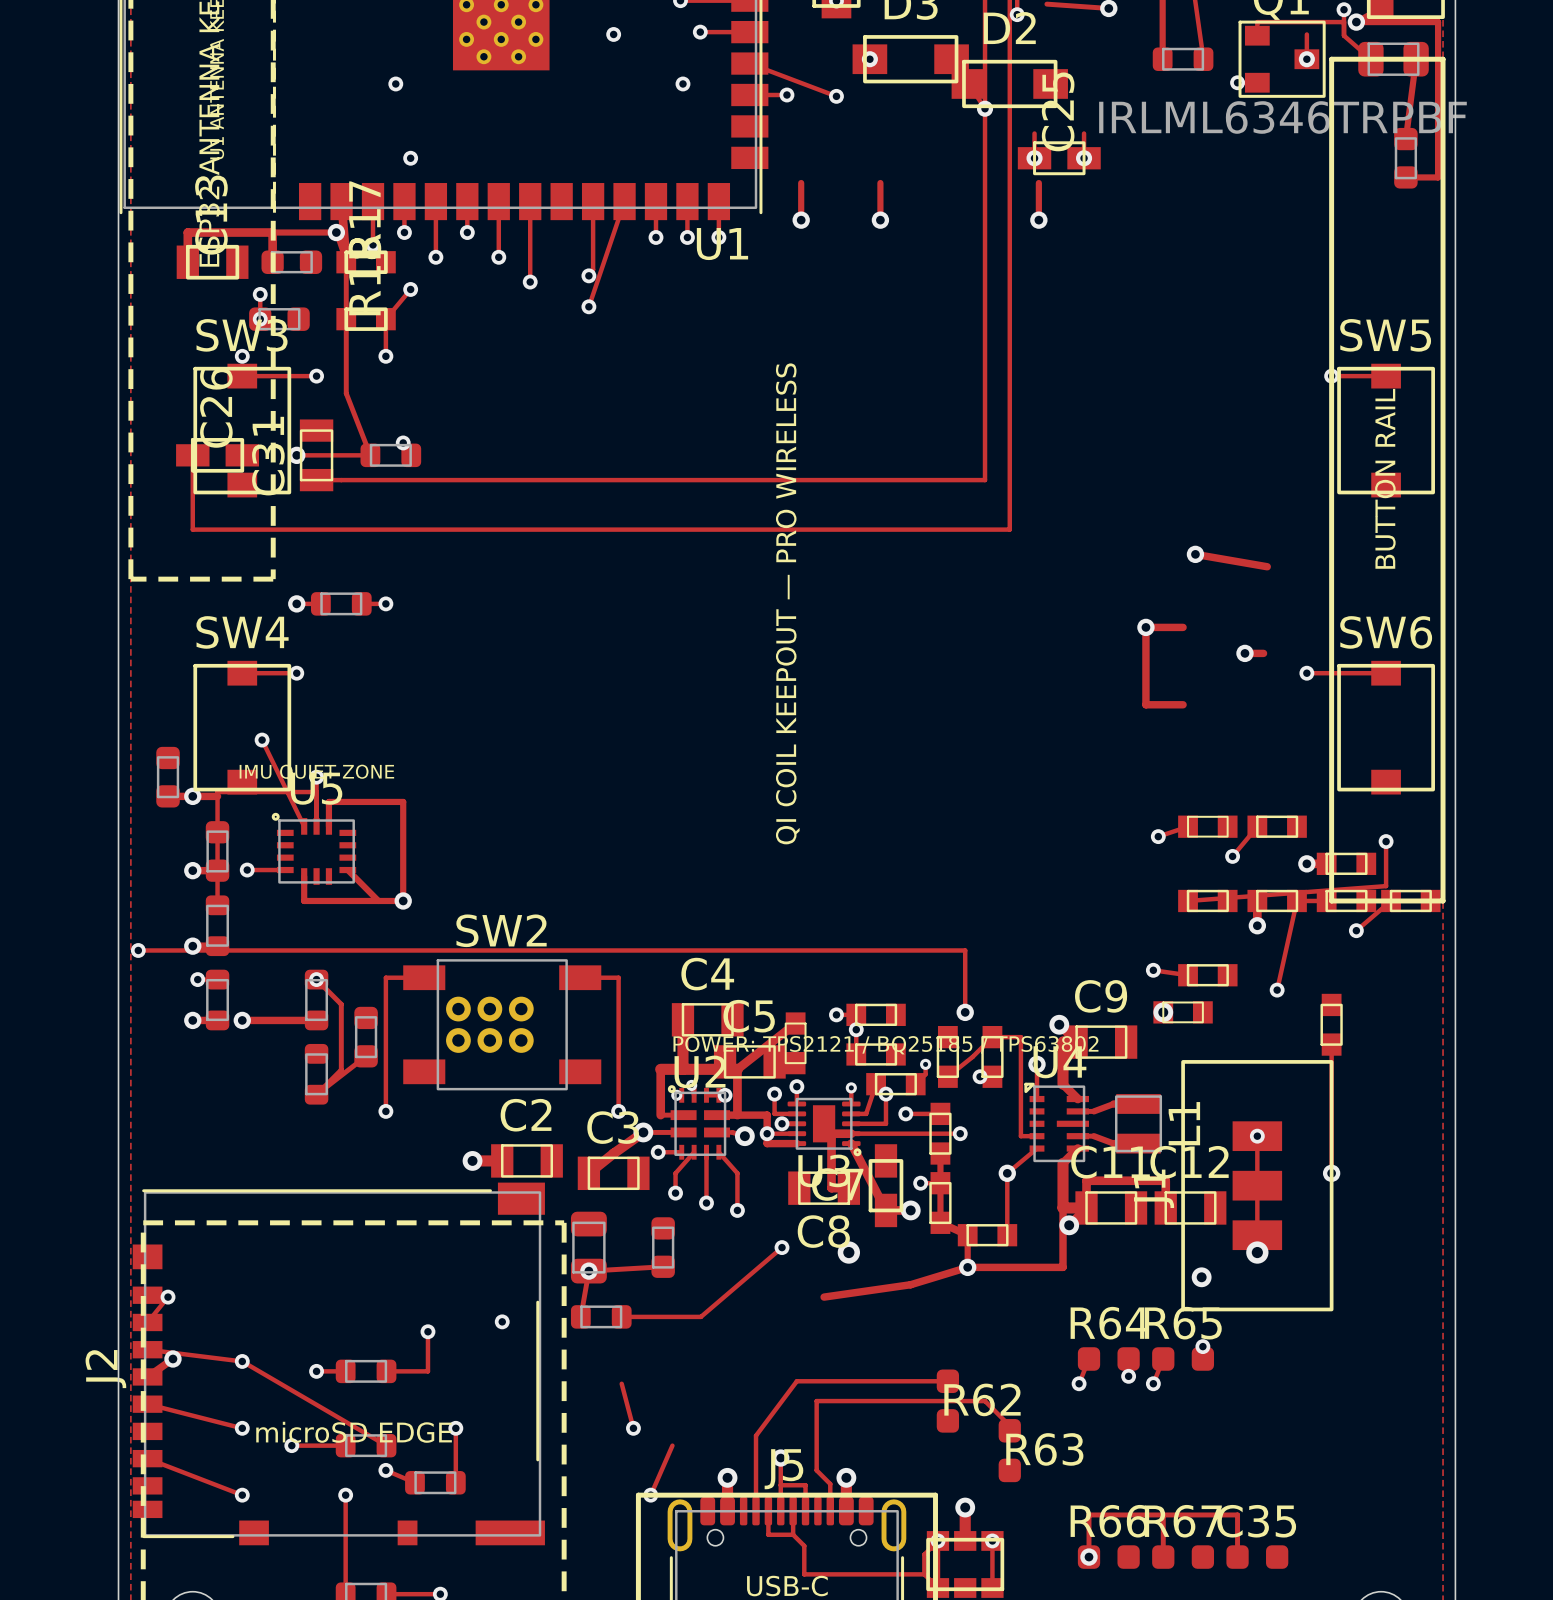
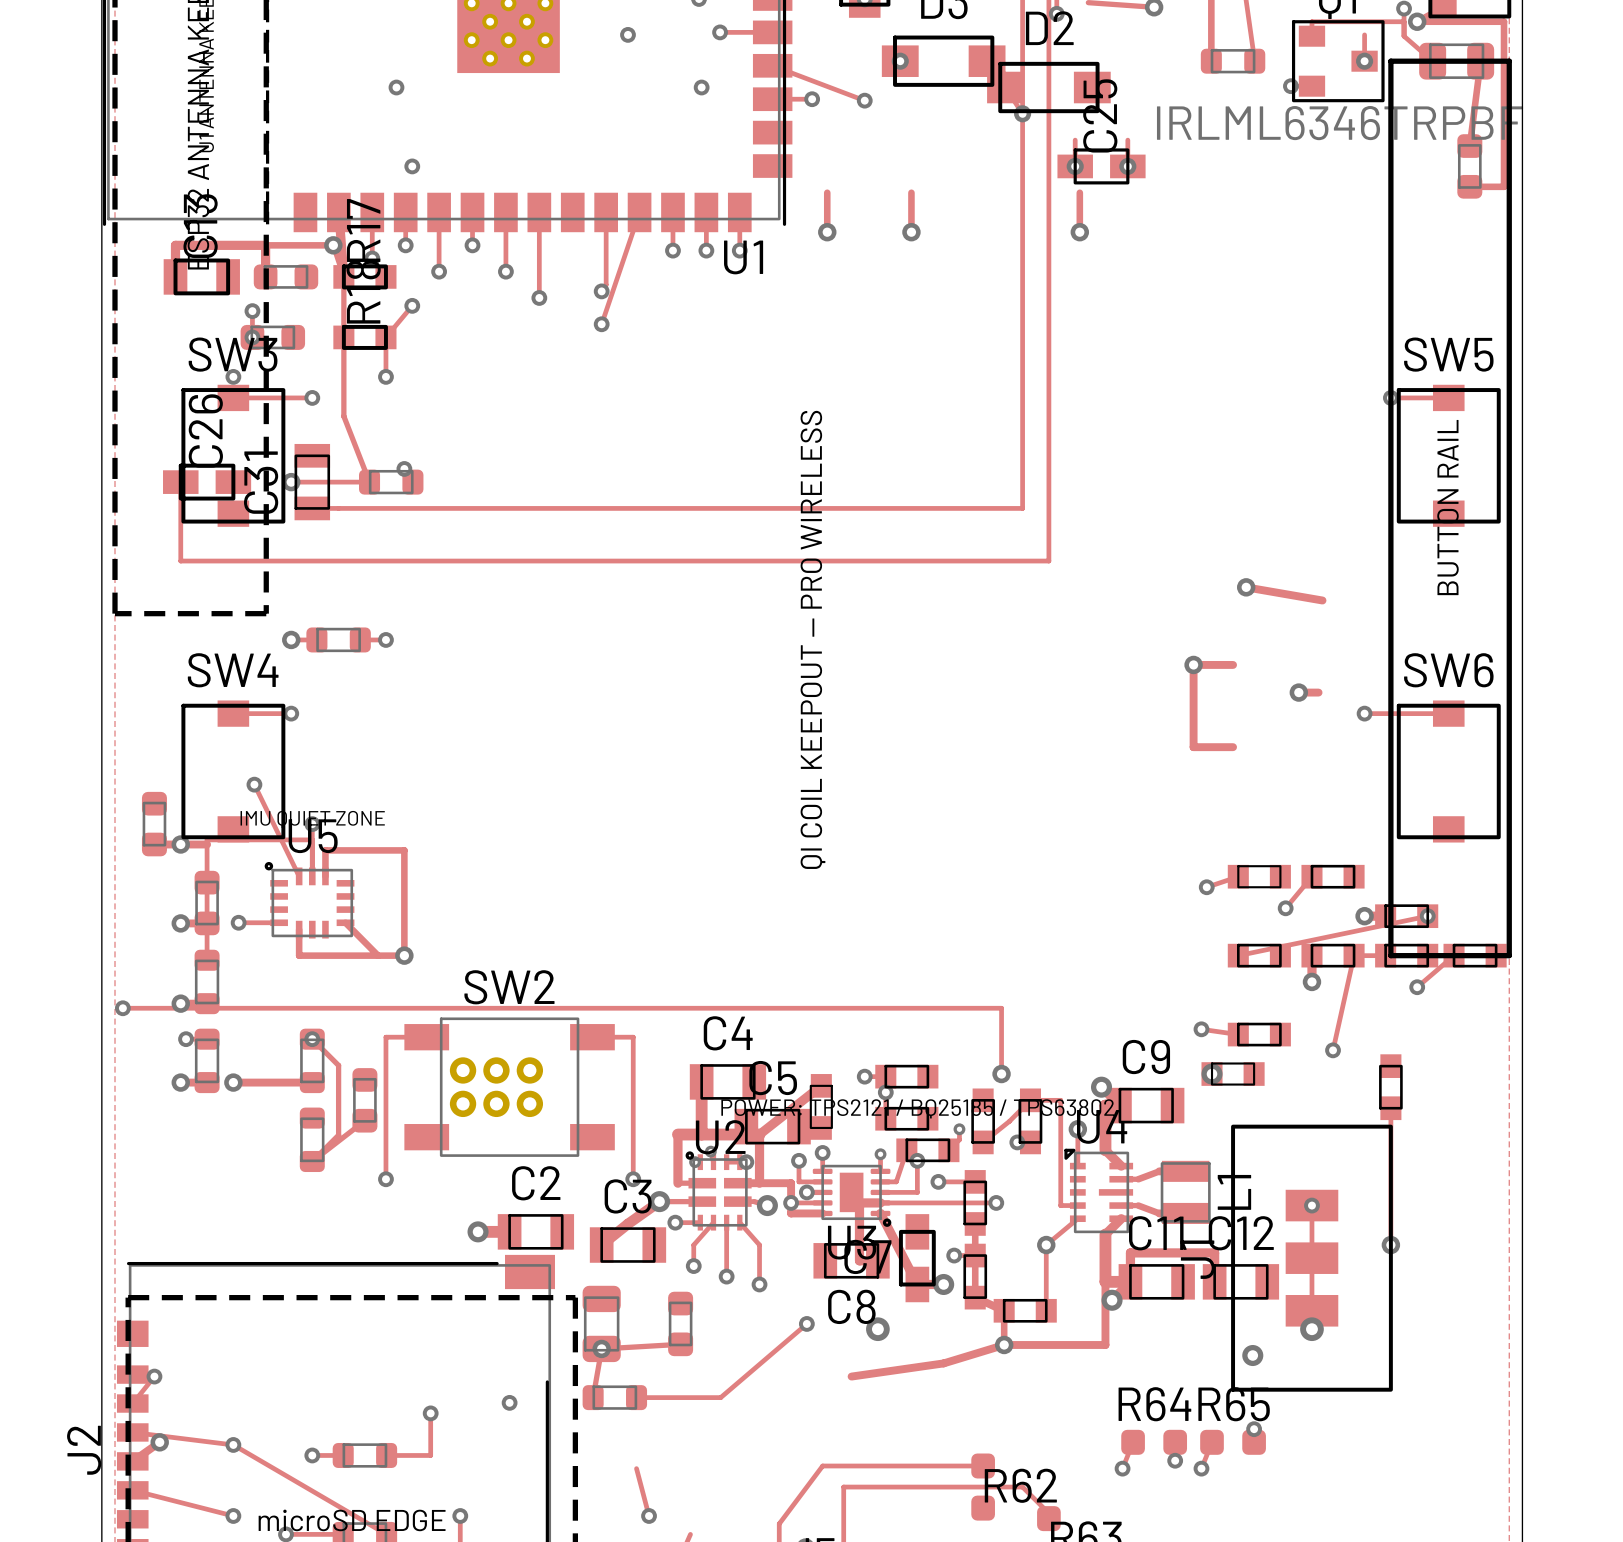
track: (1386, 841) (1386, 886) (1188, 900) -> (1427, 916) (1238, 955)
via position: (1386, 841) -> (1427, 916)

